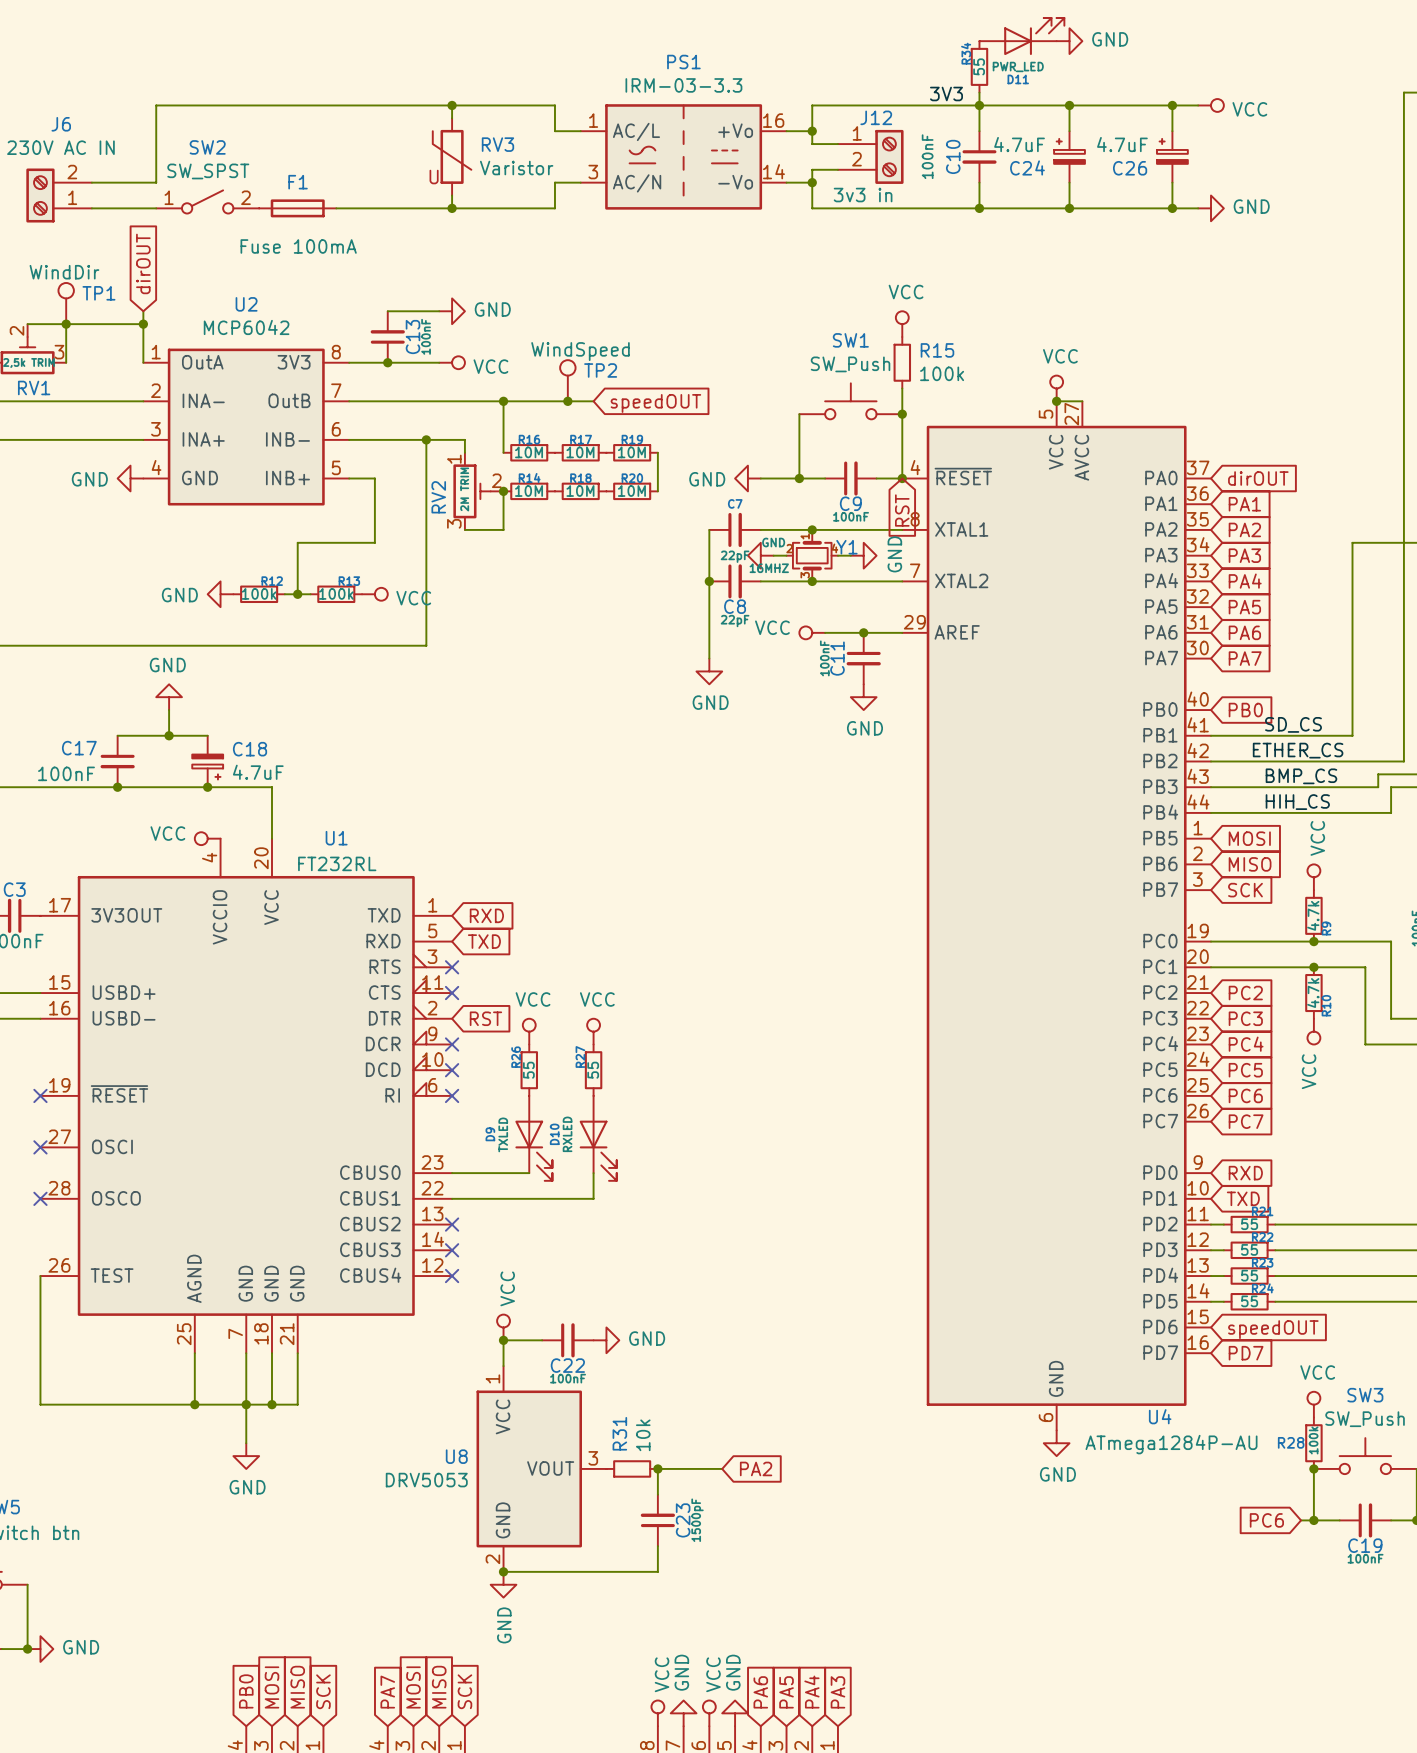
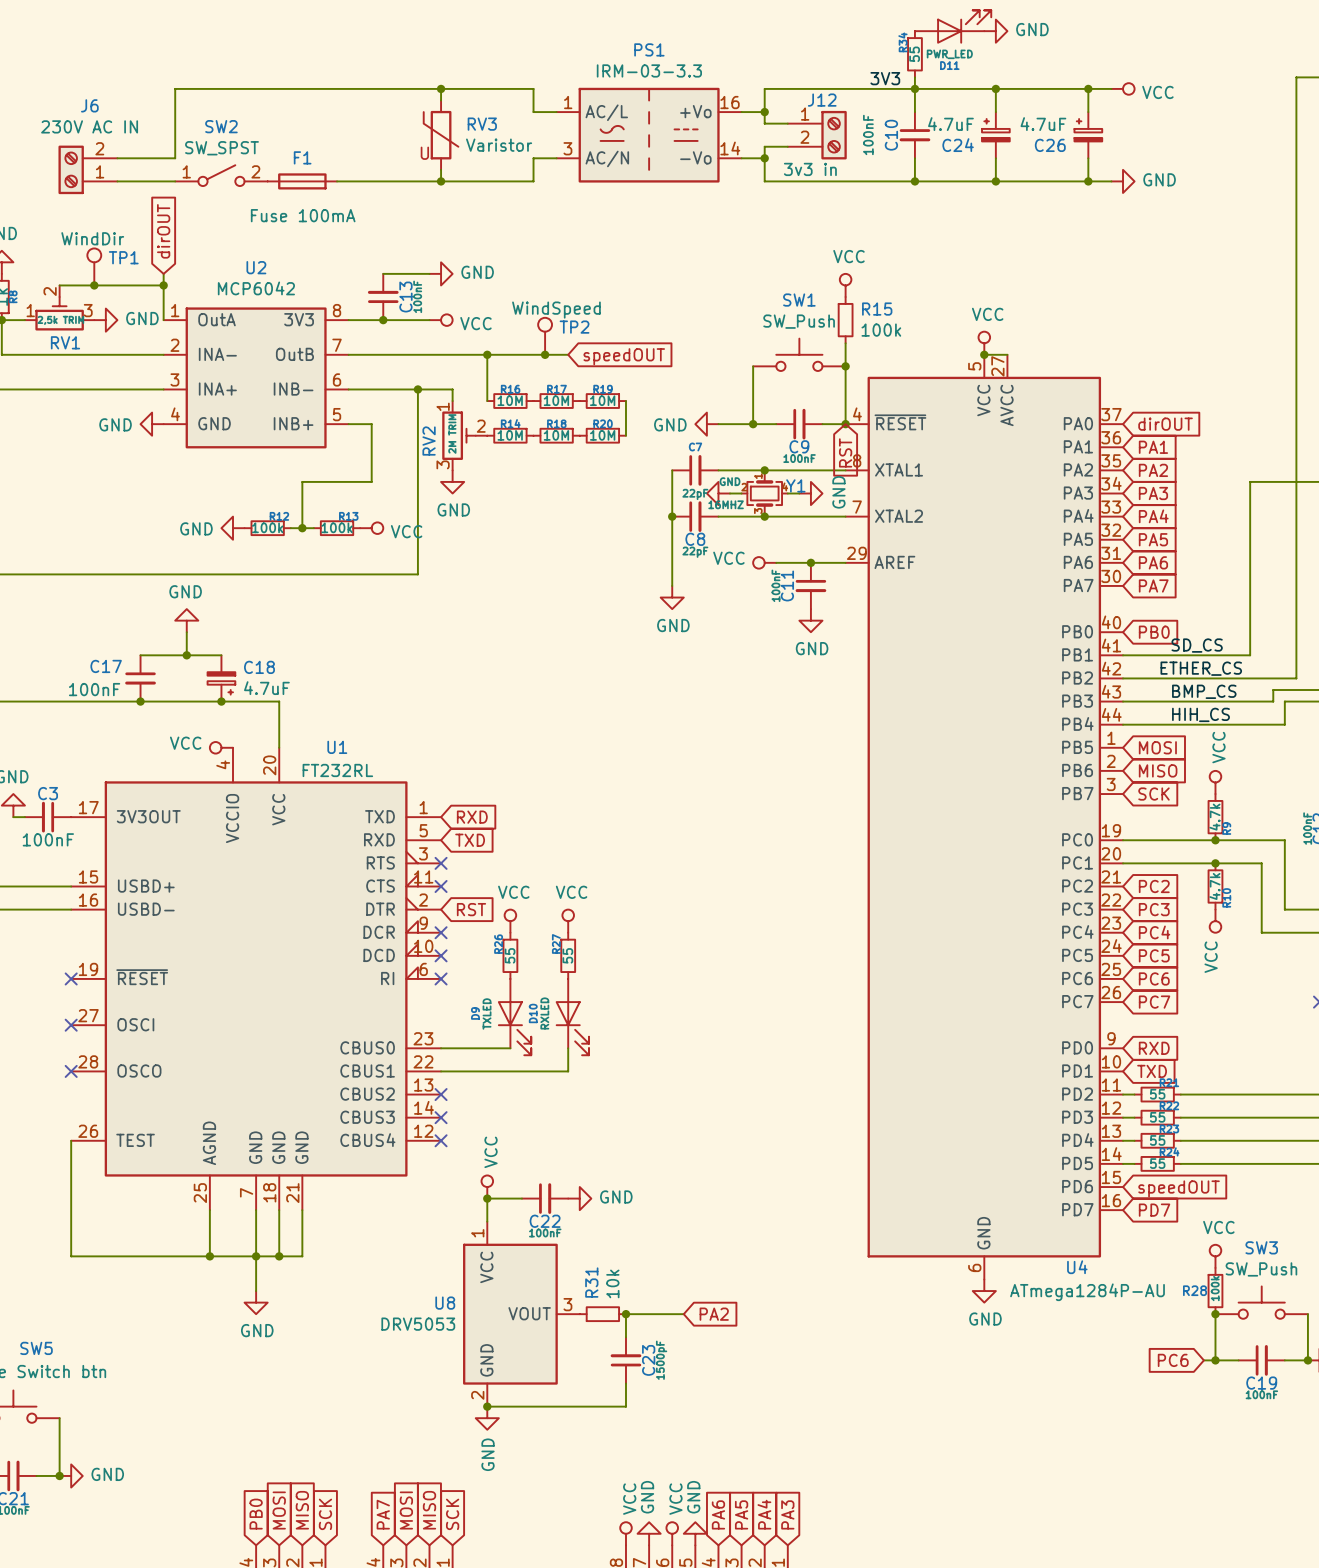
wire: (66, 324) (66, 362) -> none
power symbol: none -> GND (105, 320)
wire: (503, 491) (503, 529) (464, 529) -> none
junction: (503, 491) -> none
power symbol: none -> GND (452, 481)

